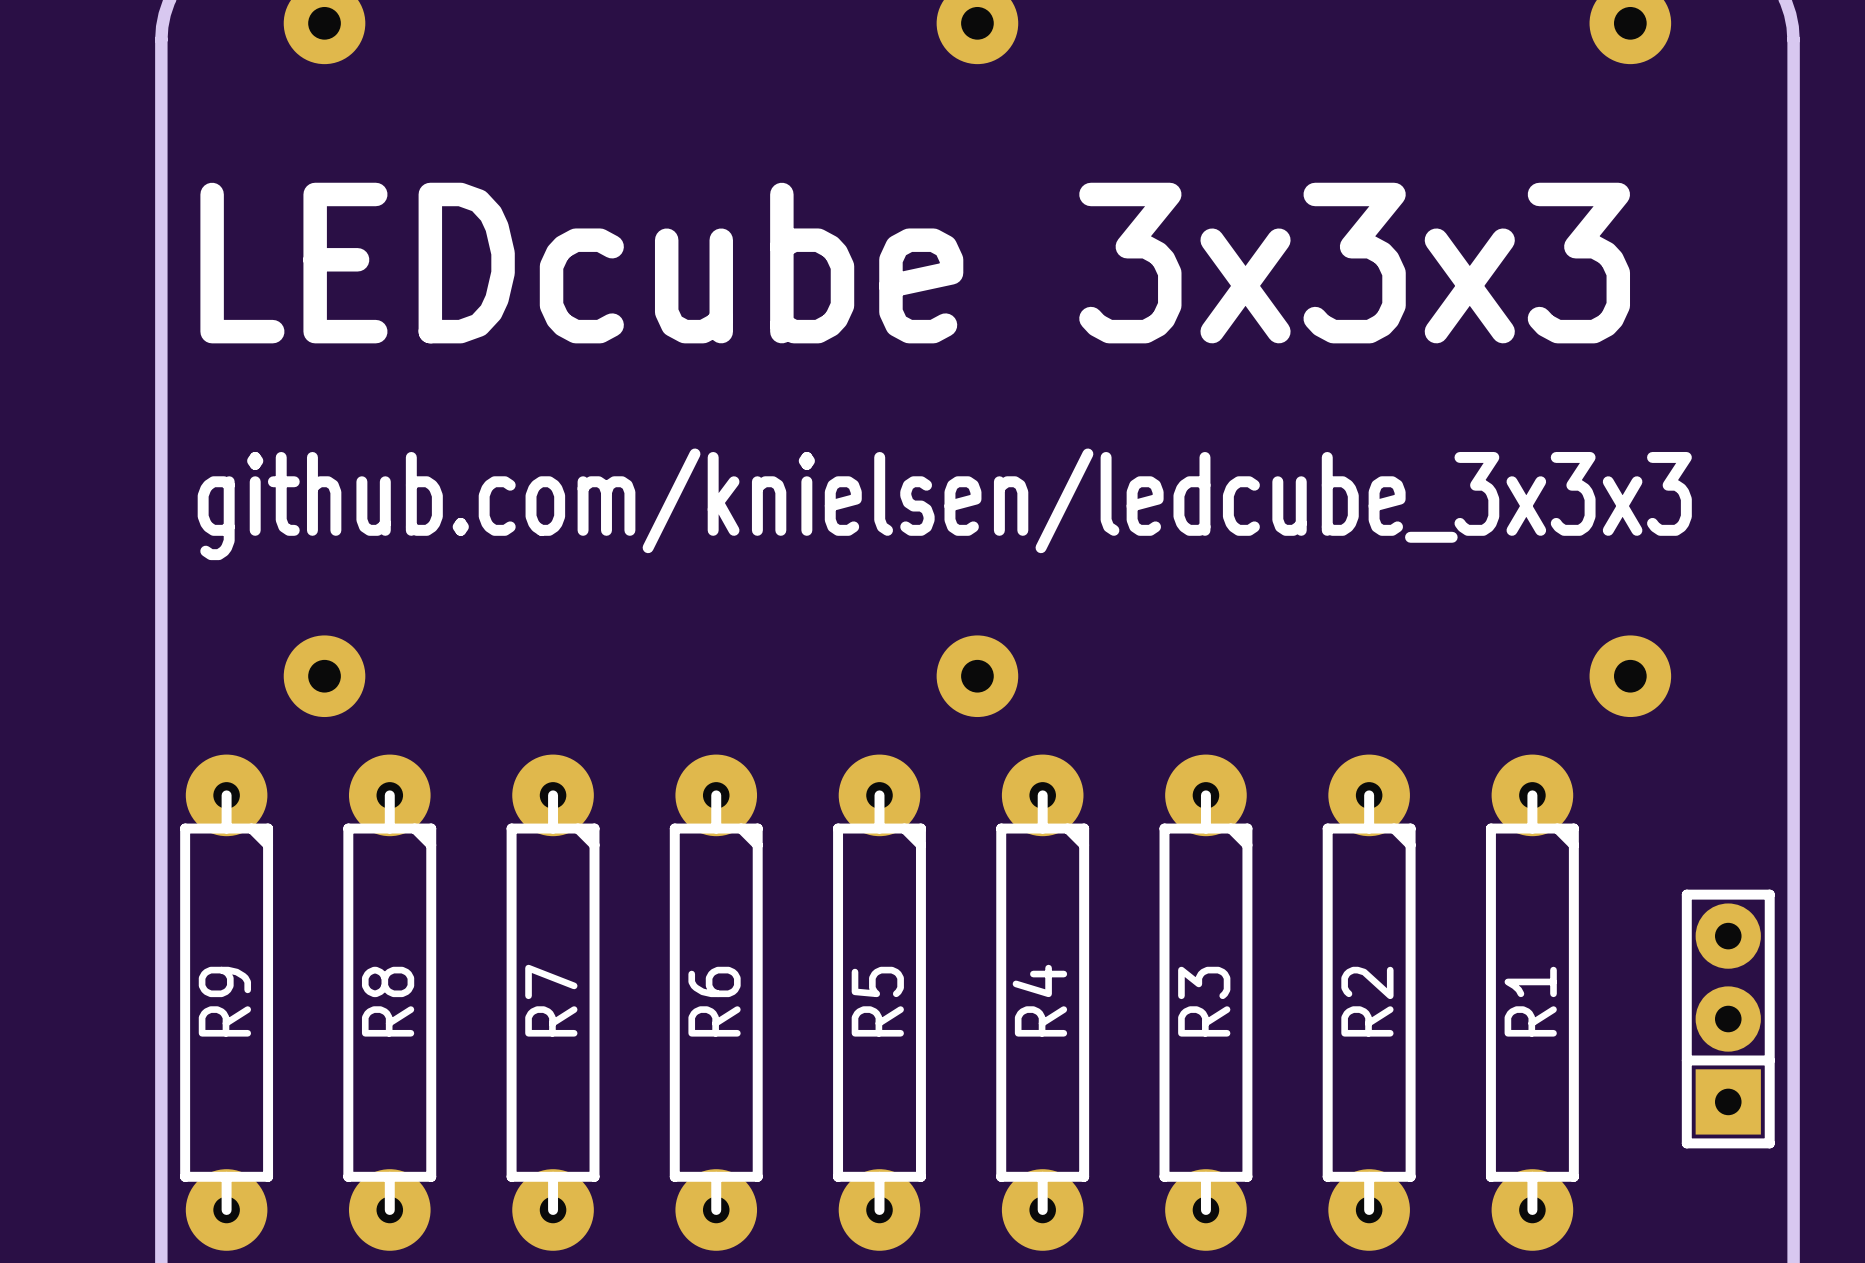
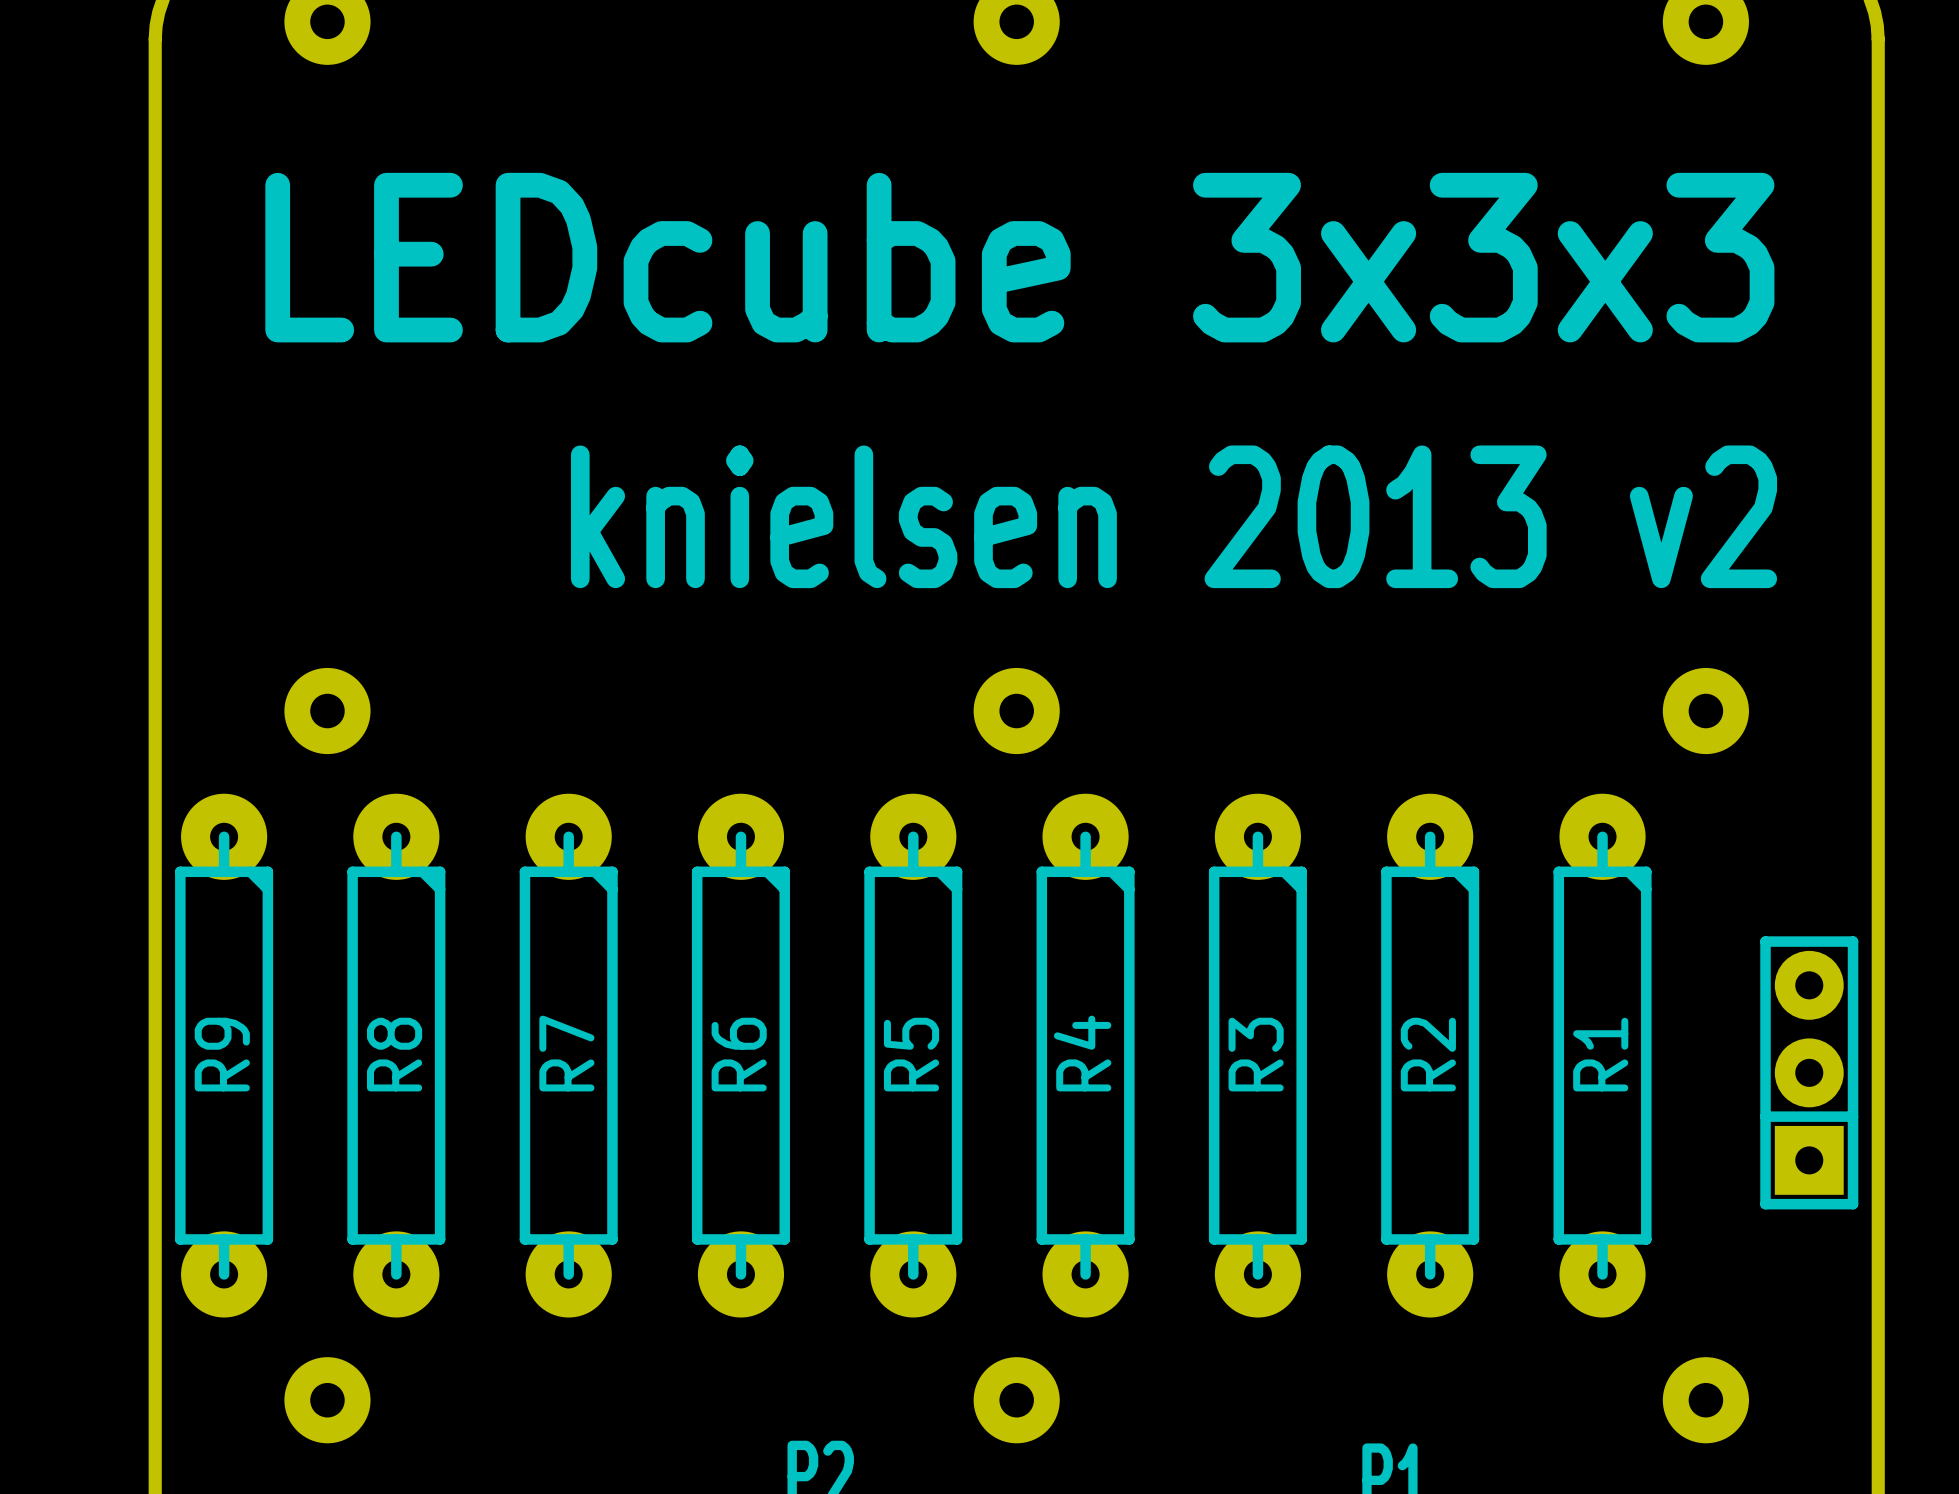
text position: LEDcube 3x3x3 (915, 263) -> LEDcube 3x3x3 (1019, 257)
text: none -> knielsen 2013 v2 (1174, 516)
text: github.com/knielsen/ledcube_3x3x3 (944, 504) -> none

